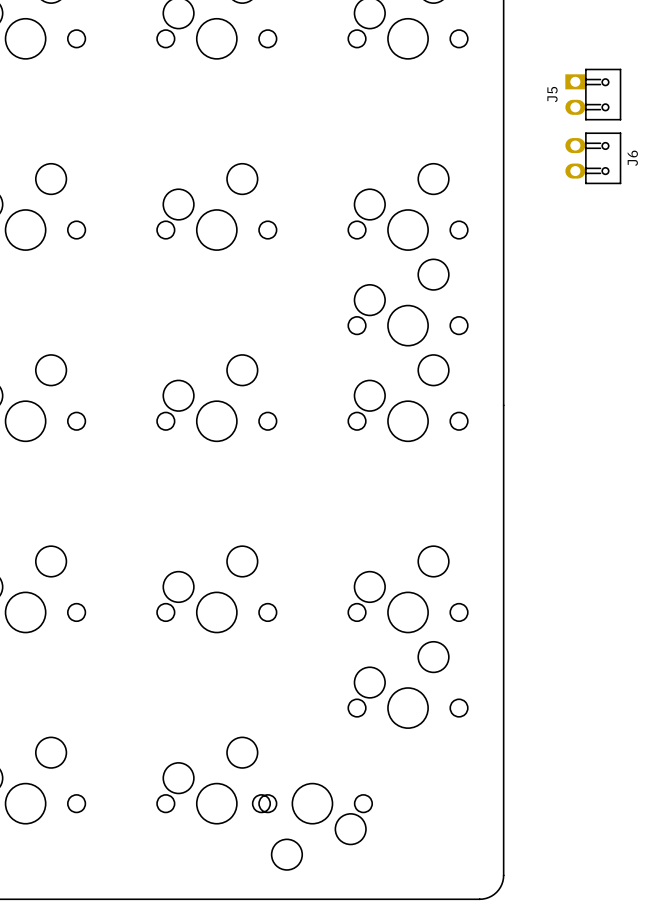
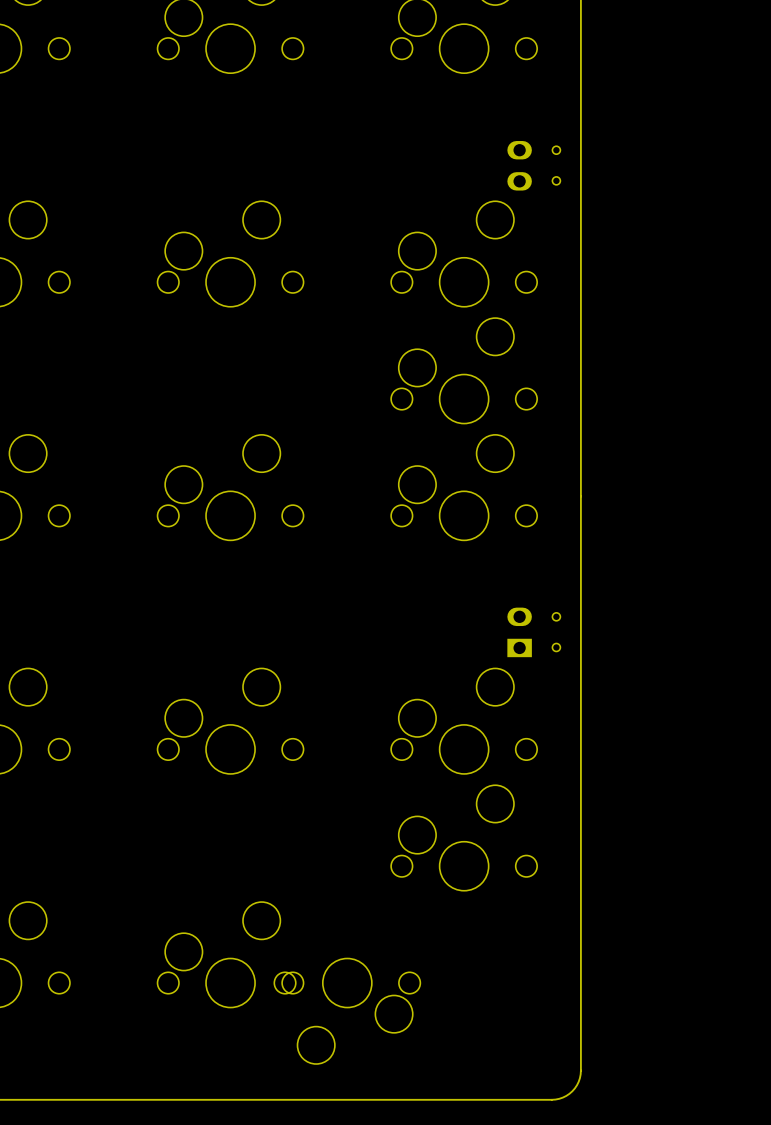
J5: (593, 94) -> none
J6 side: top (593, 158) -> bottom (533, 165)
part: none -> (533, 632)

